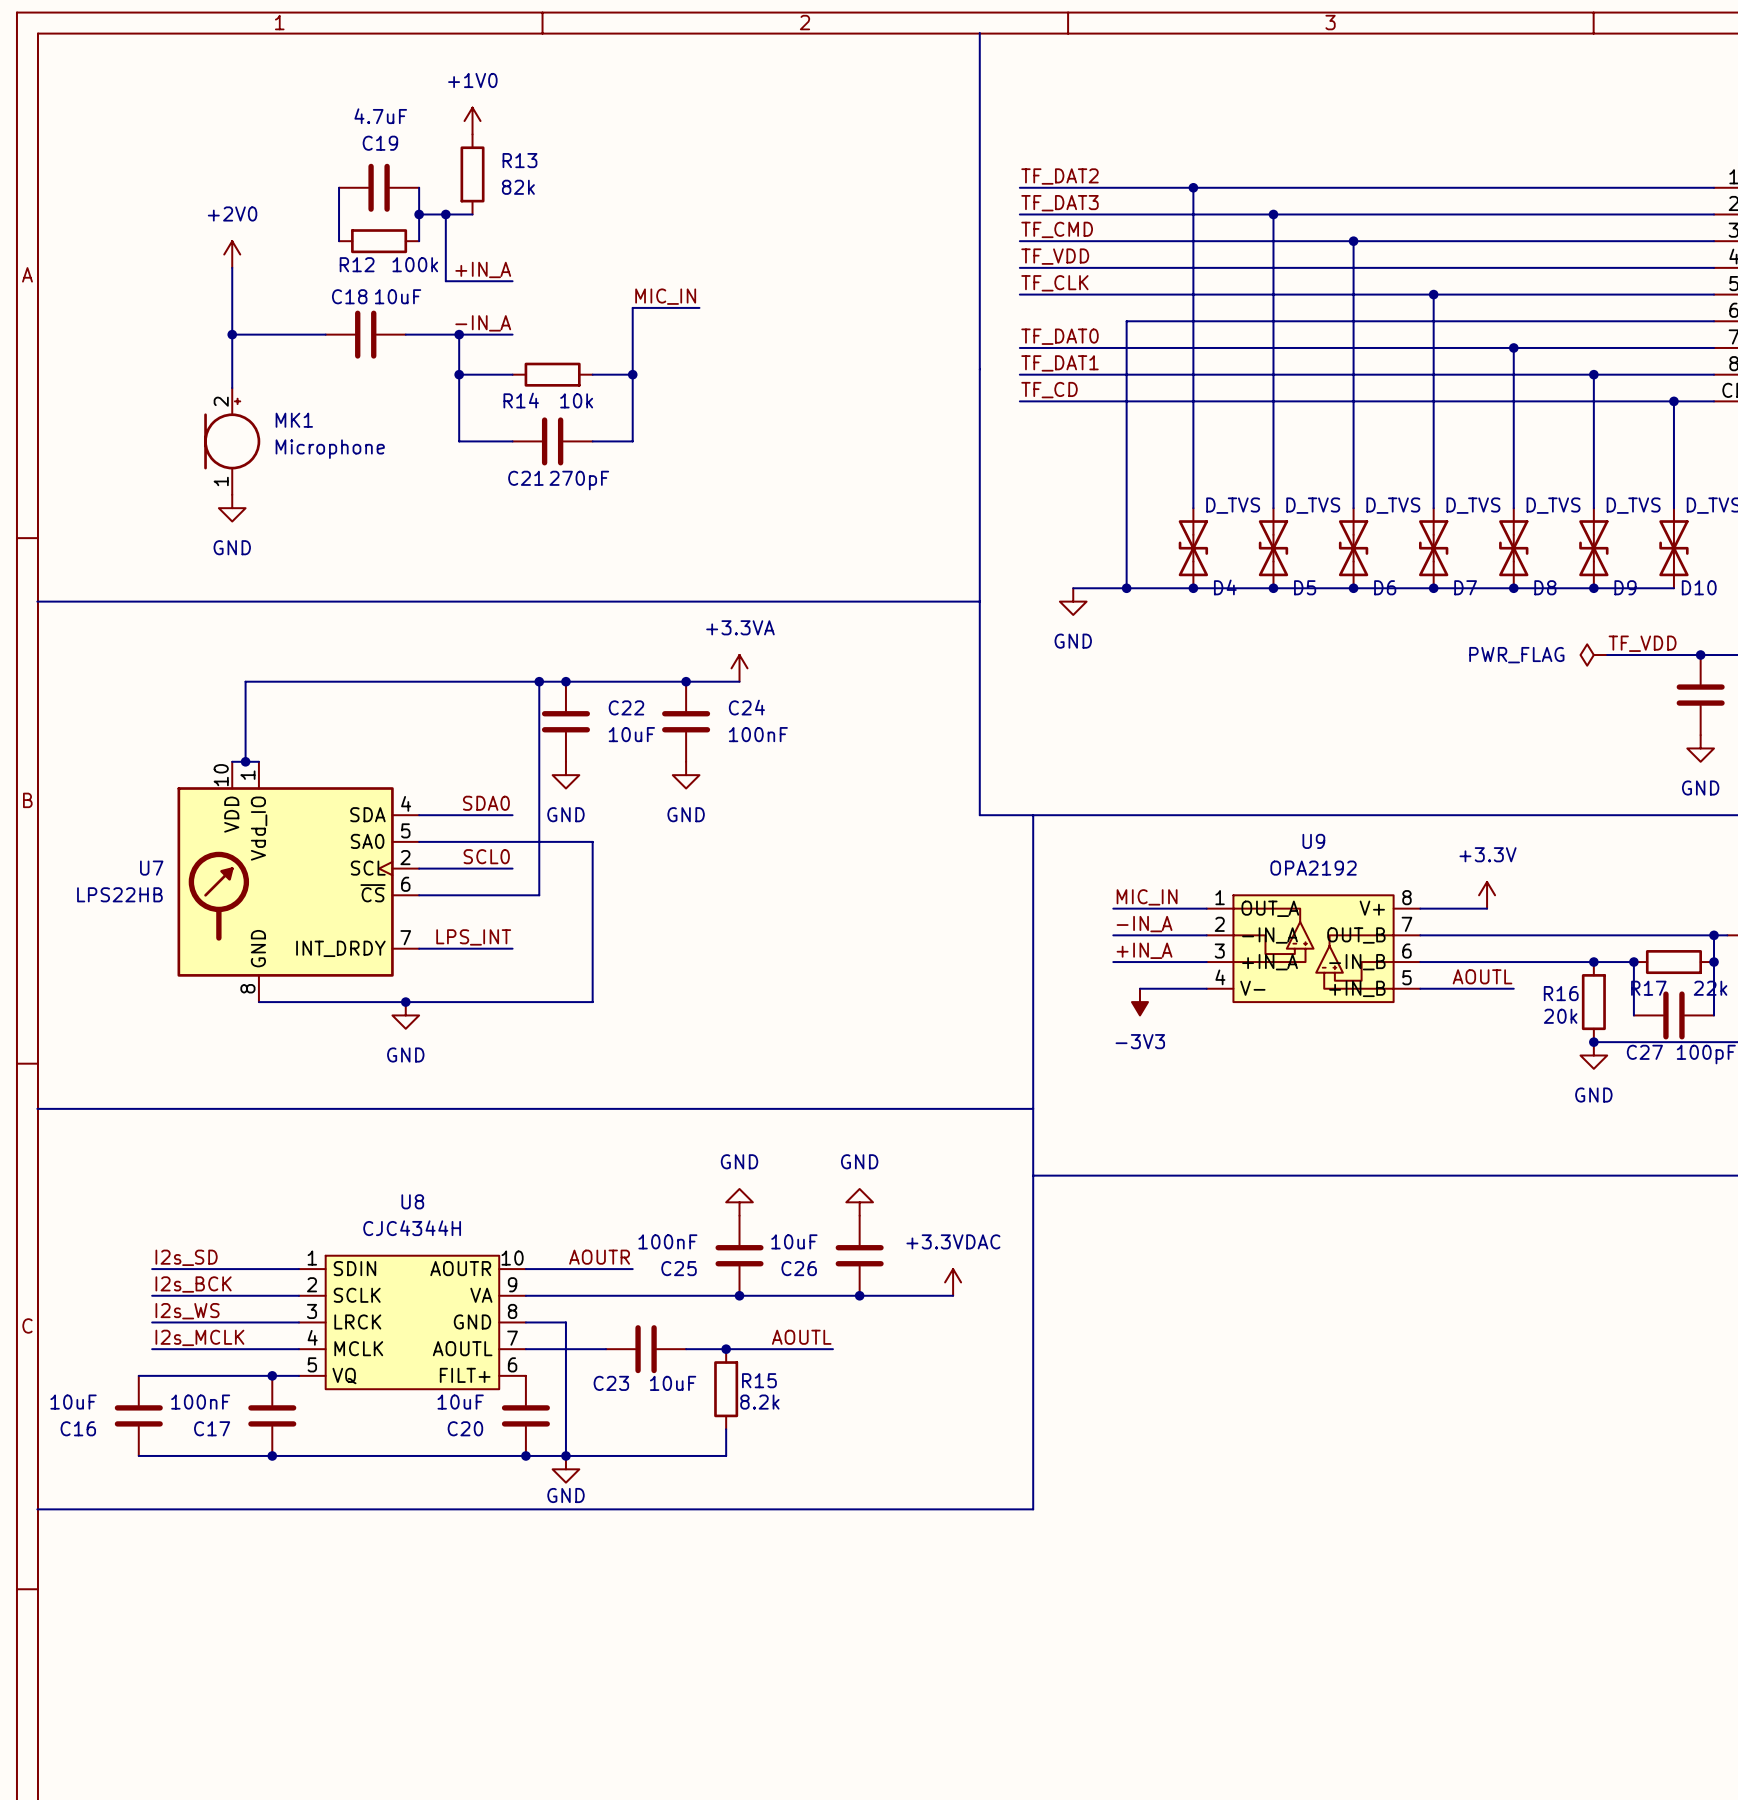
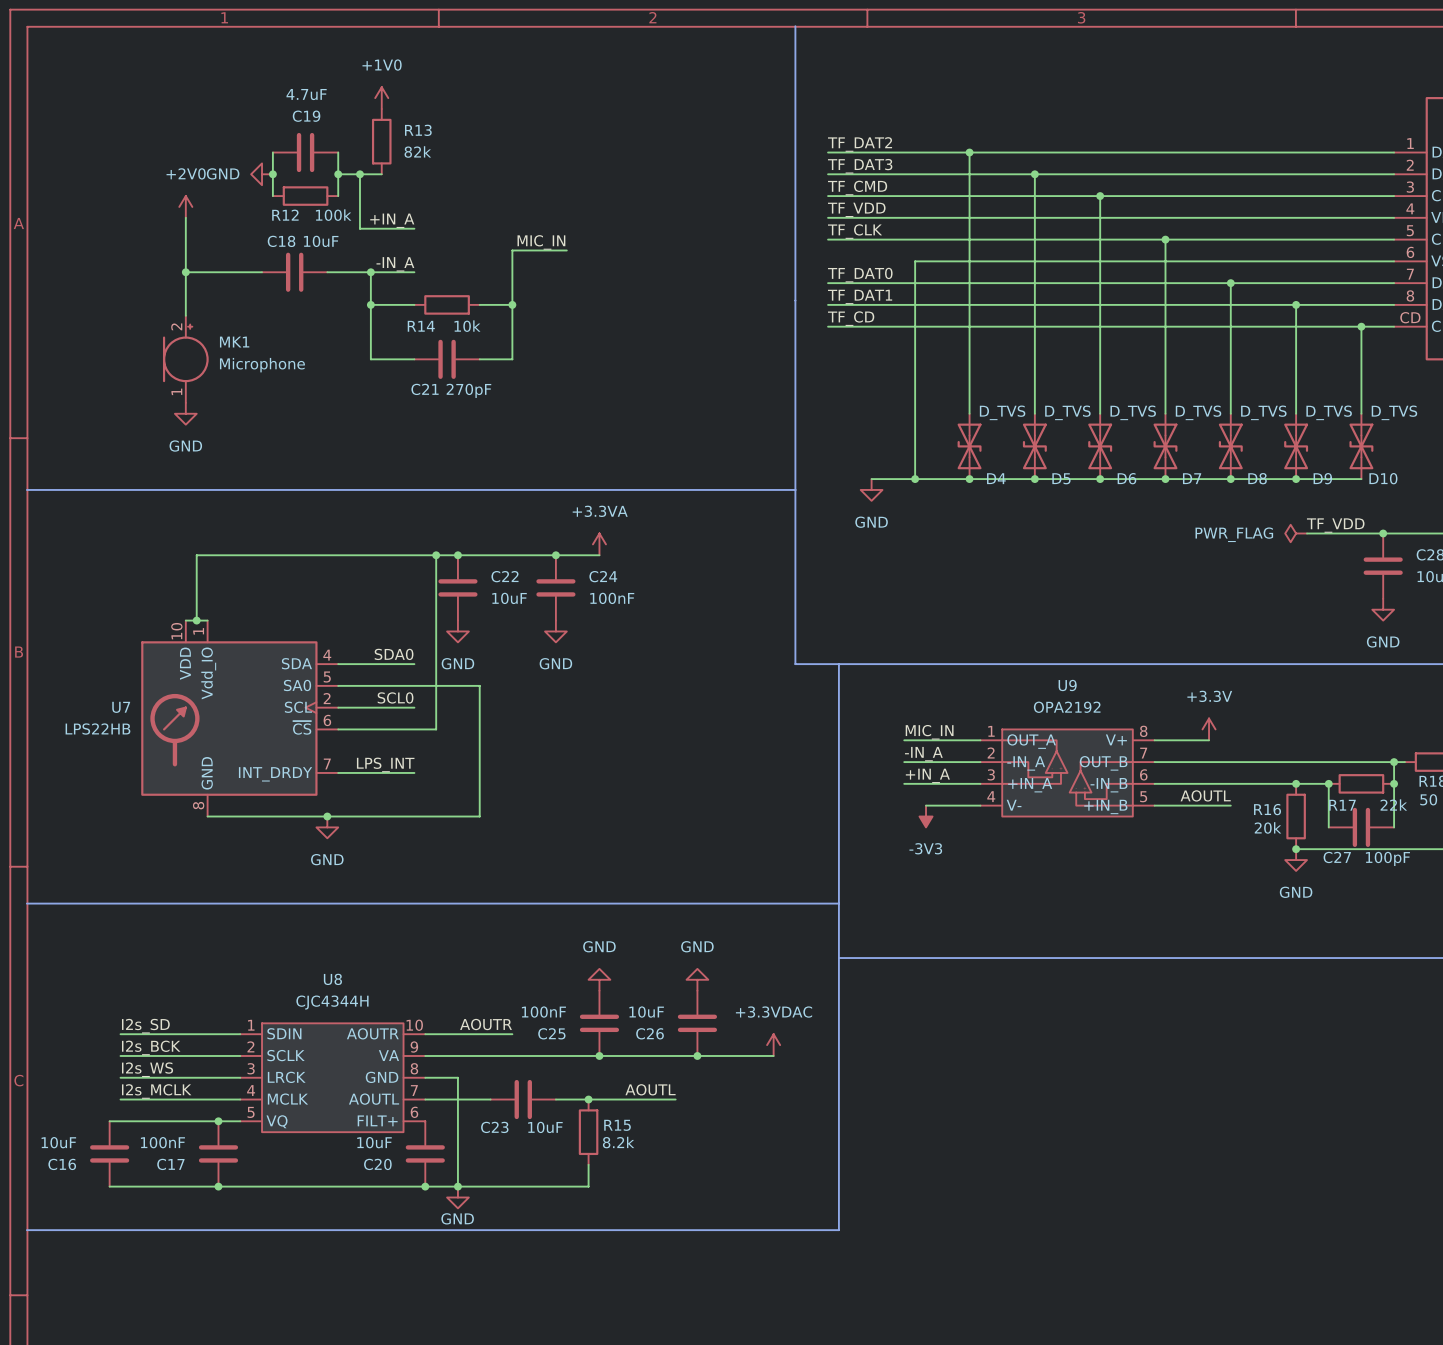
power symbol: none -> GND (262, 174)
junction: none -> (272, 174)

